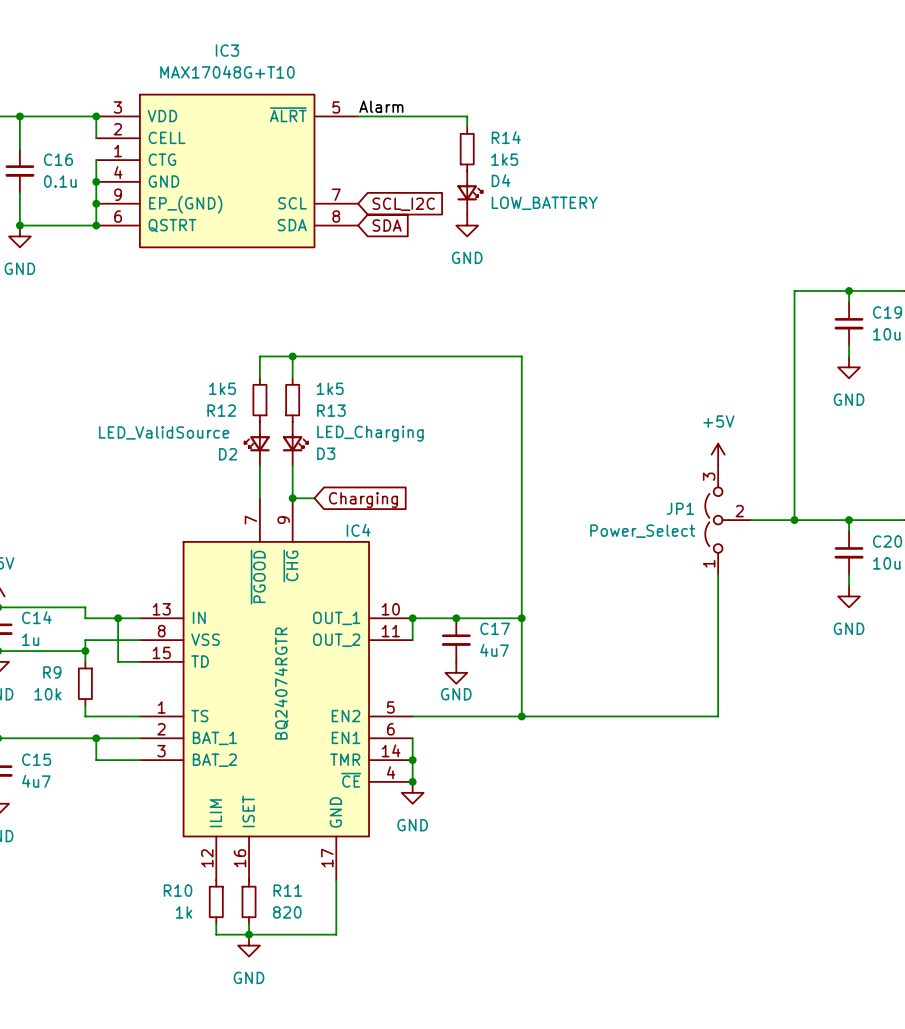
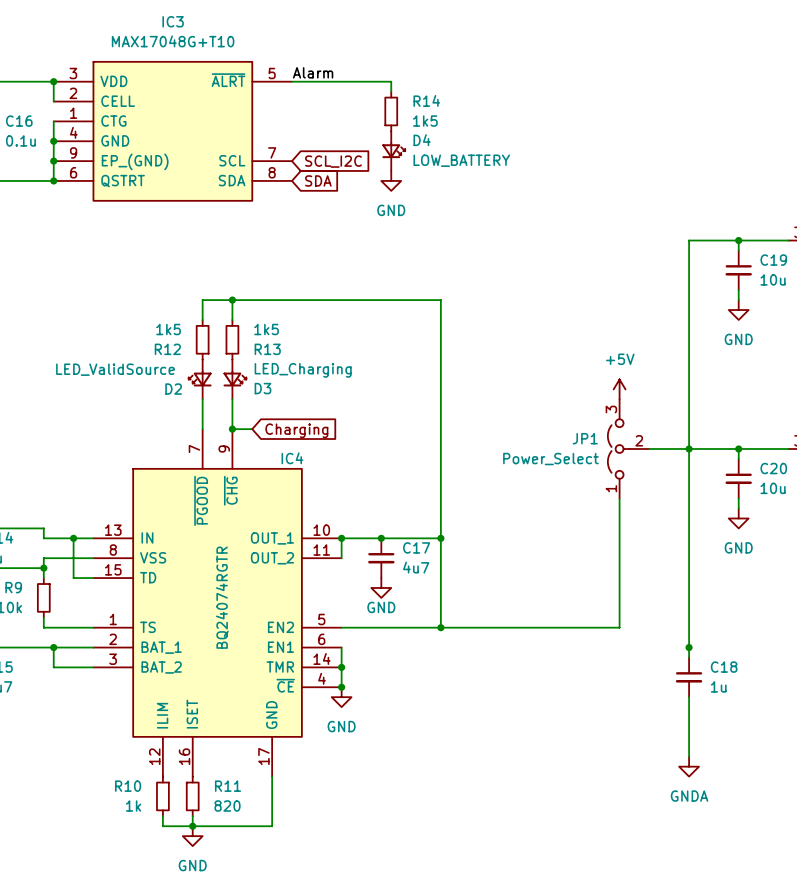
wire: none -> (689, 449) (689, 657)
junction: none -> (689, 647)
C18: none -> 1u (689, 677)
wire: none -> (689, 697) (689, 756)
power symbol: none -> GNDA (689, 766)

